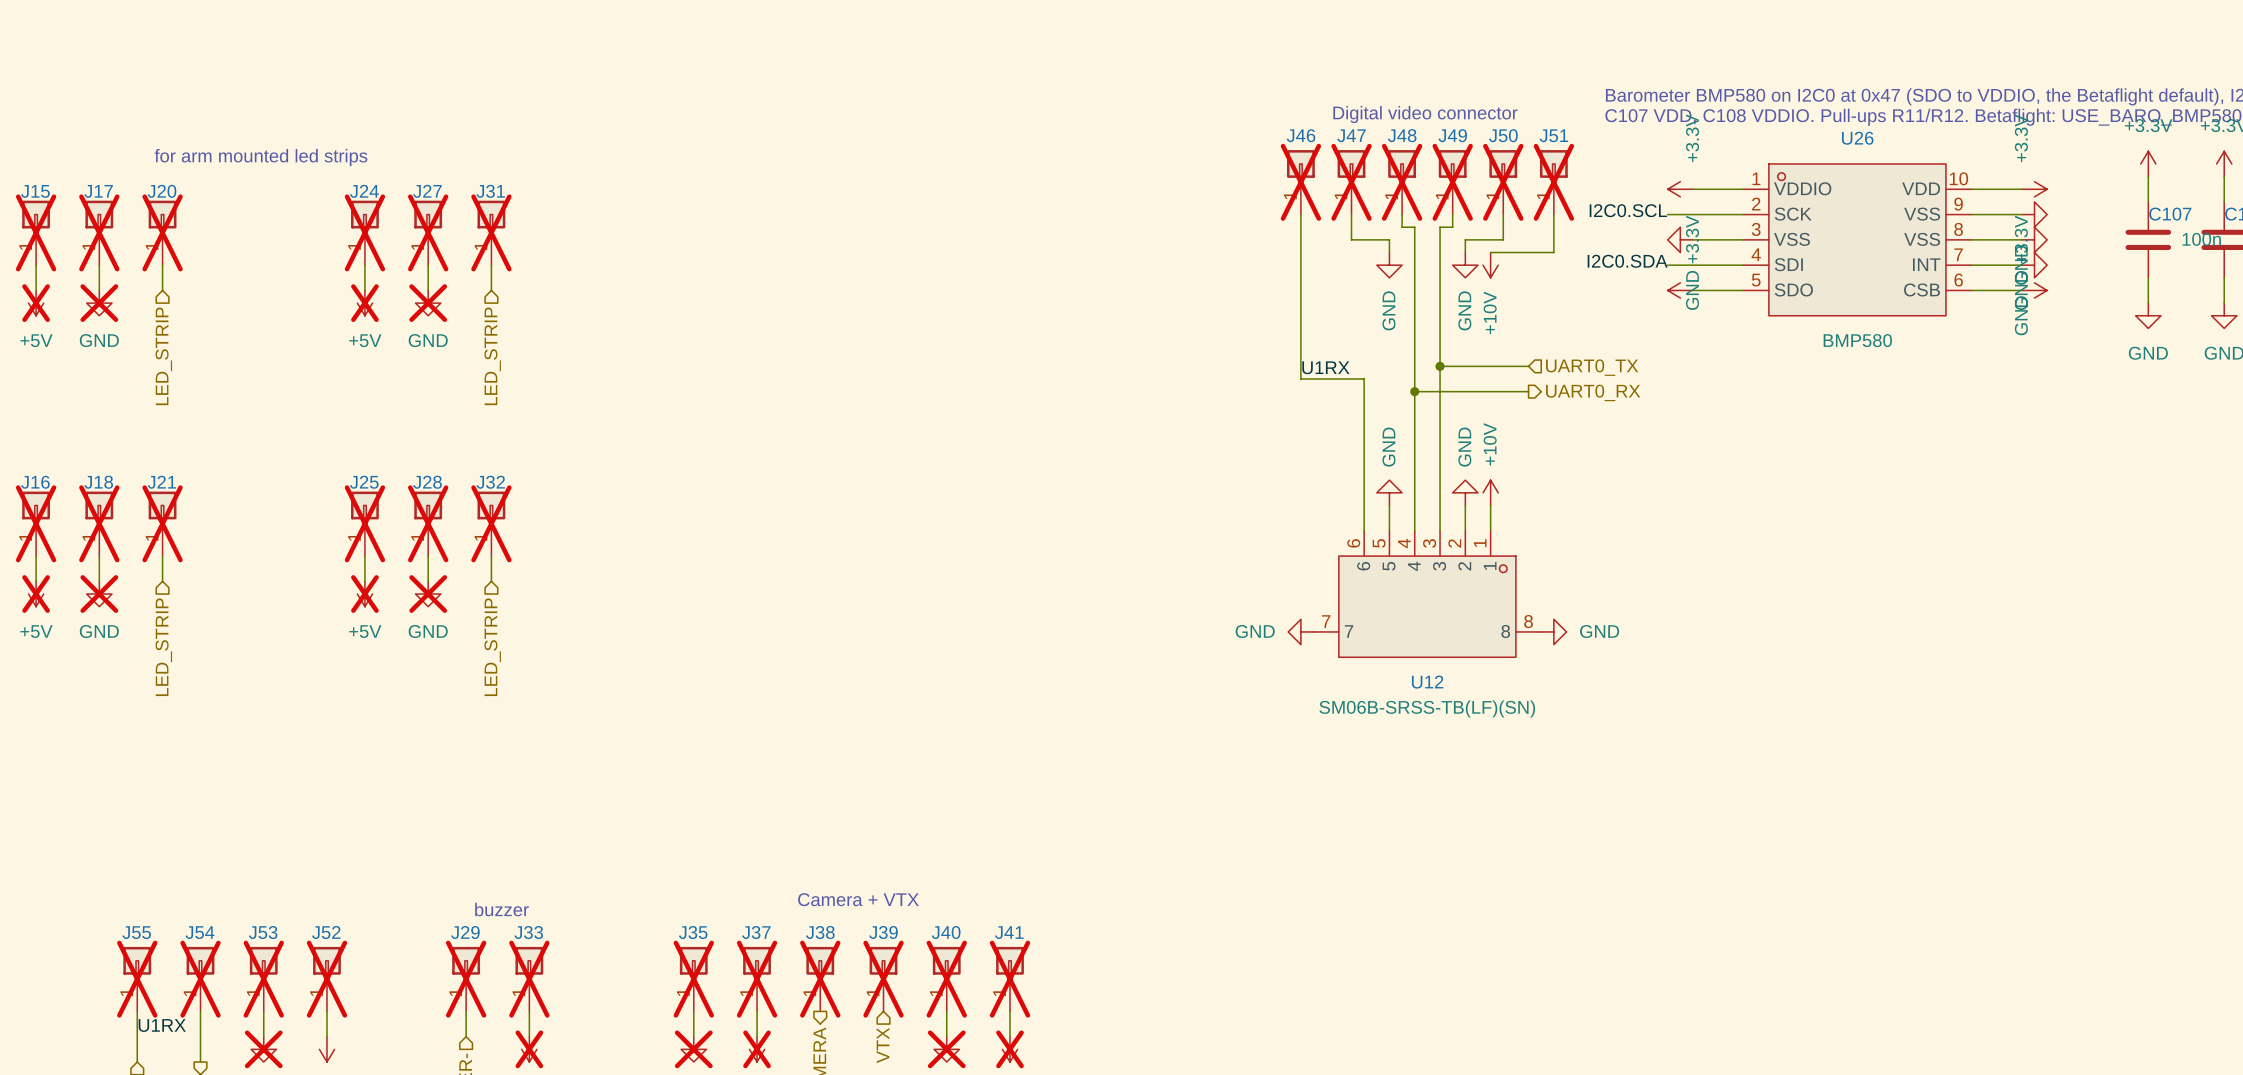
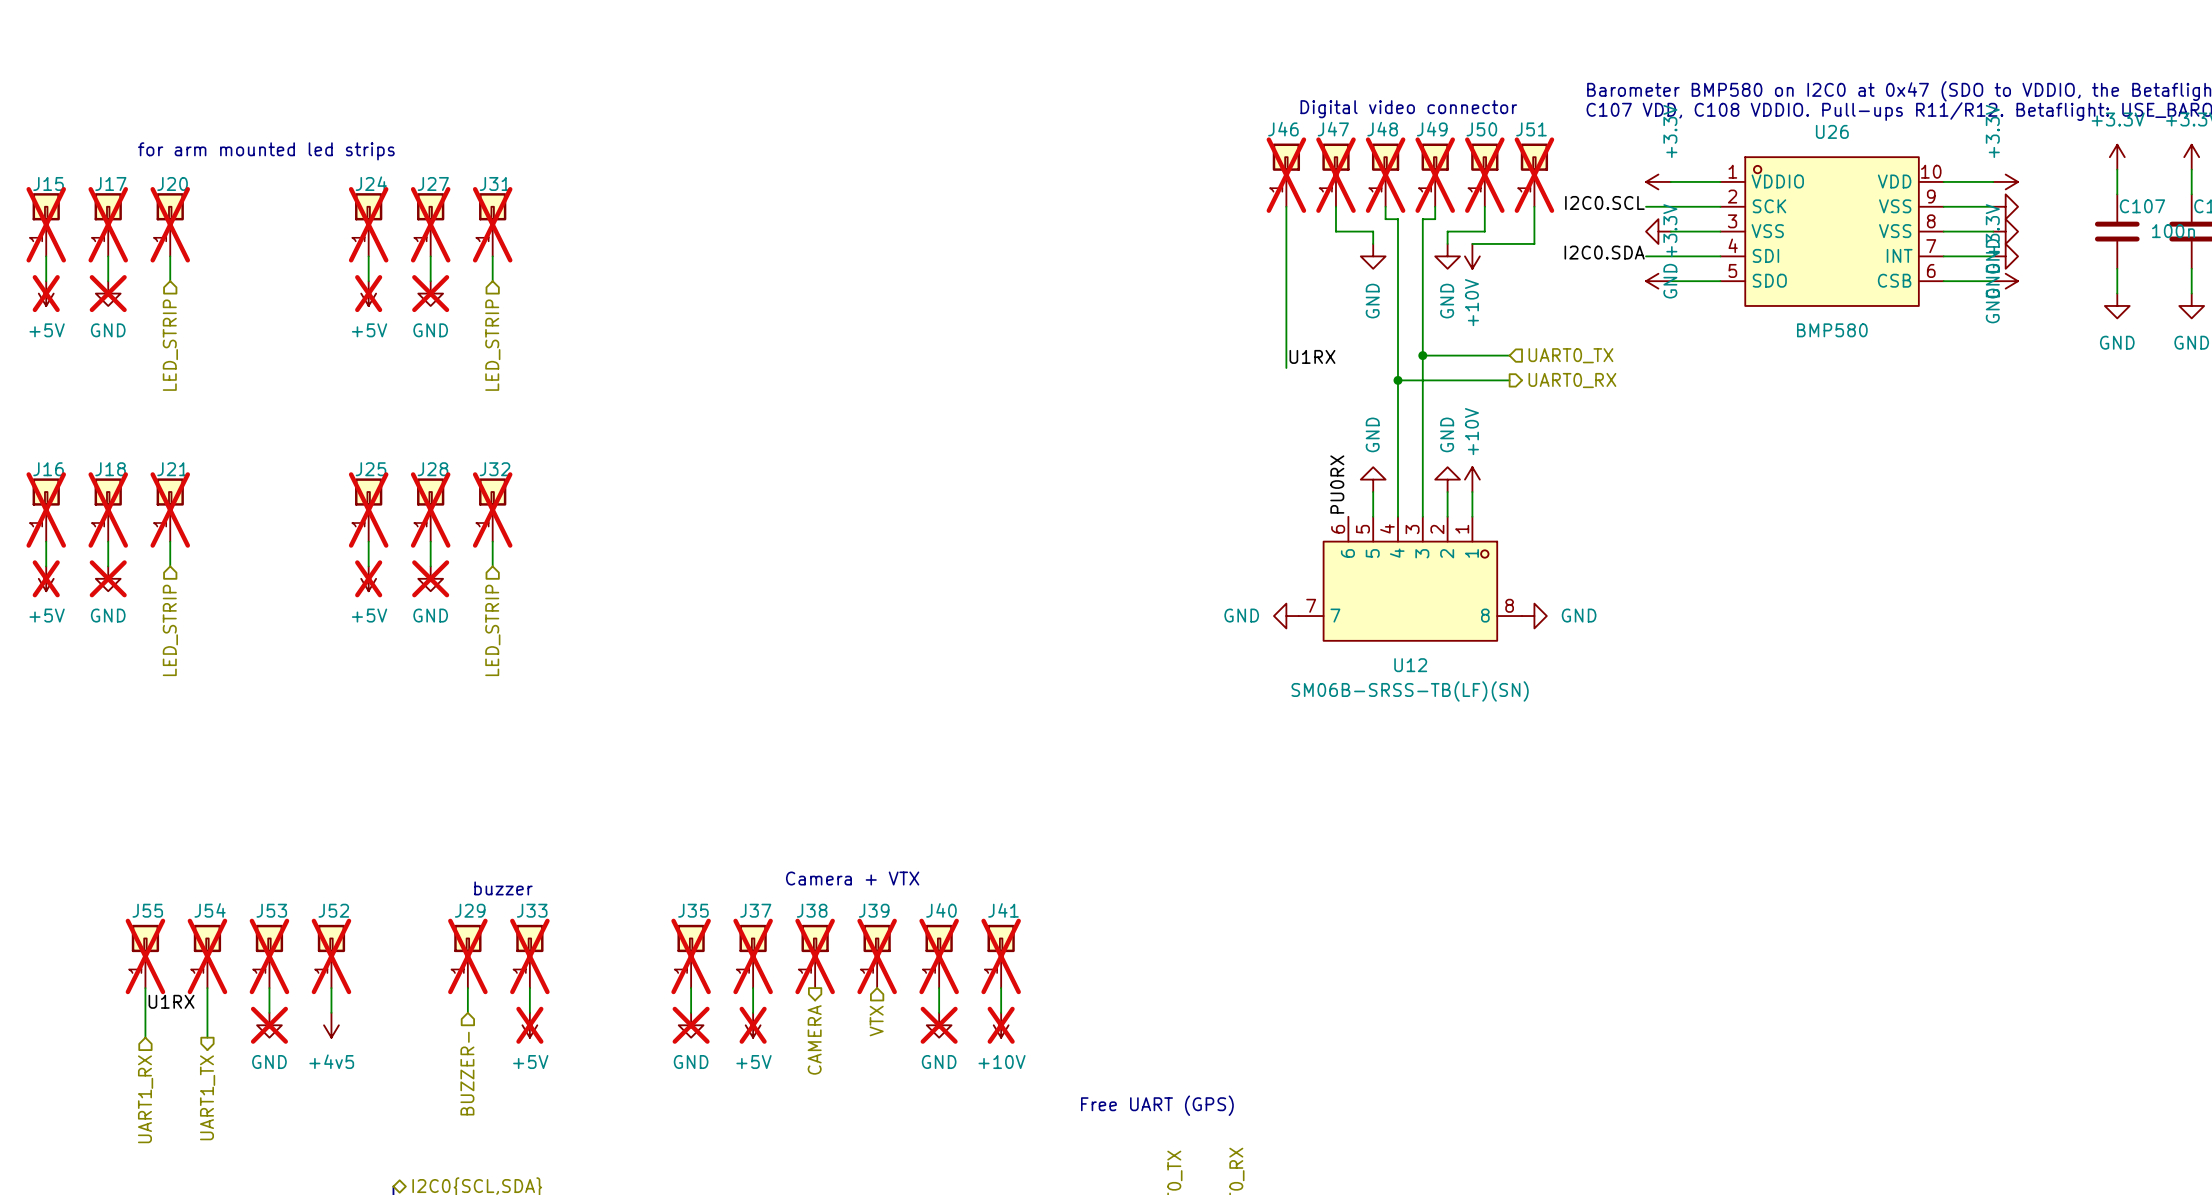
wire: (1300, 379) (1364, 379) (1364, 530) -> none
label: none -> PU0RX (1337, 484)

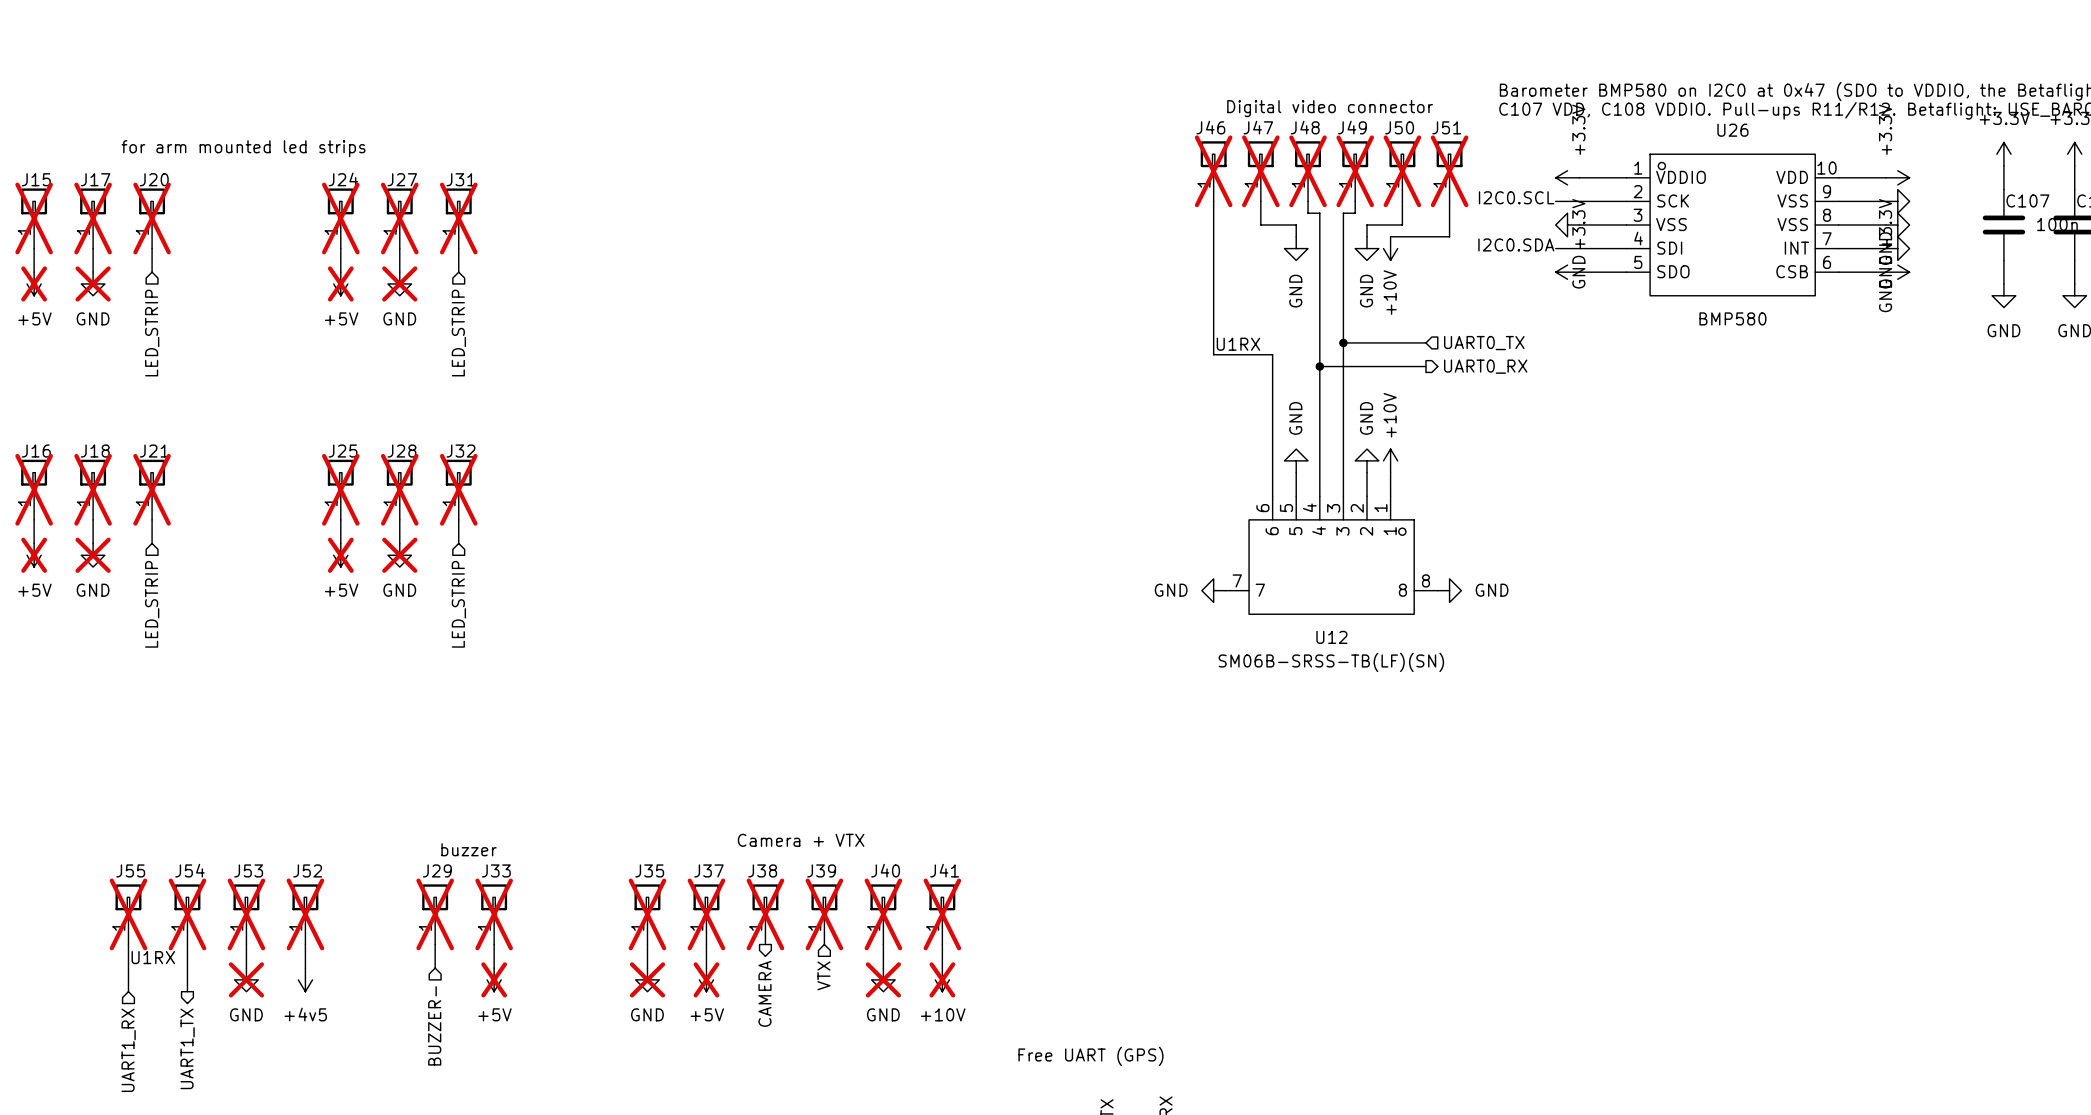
wire: none -> (1213, 354) (1272, 354) (1272, 496)
label: PU0RX (1337, 484) -> none

